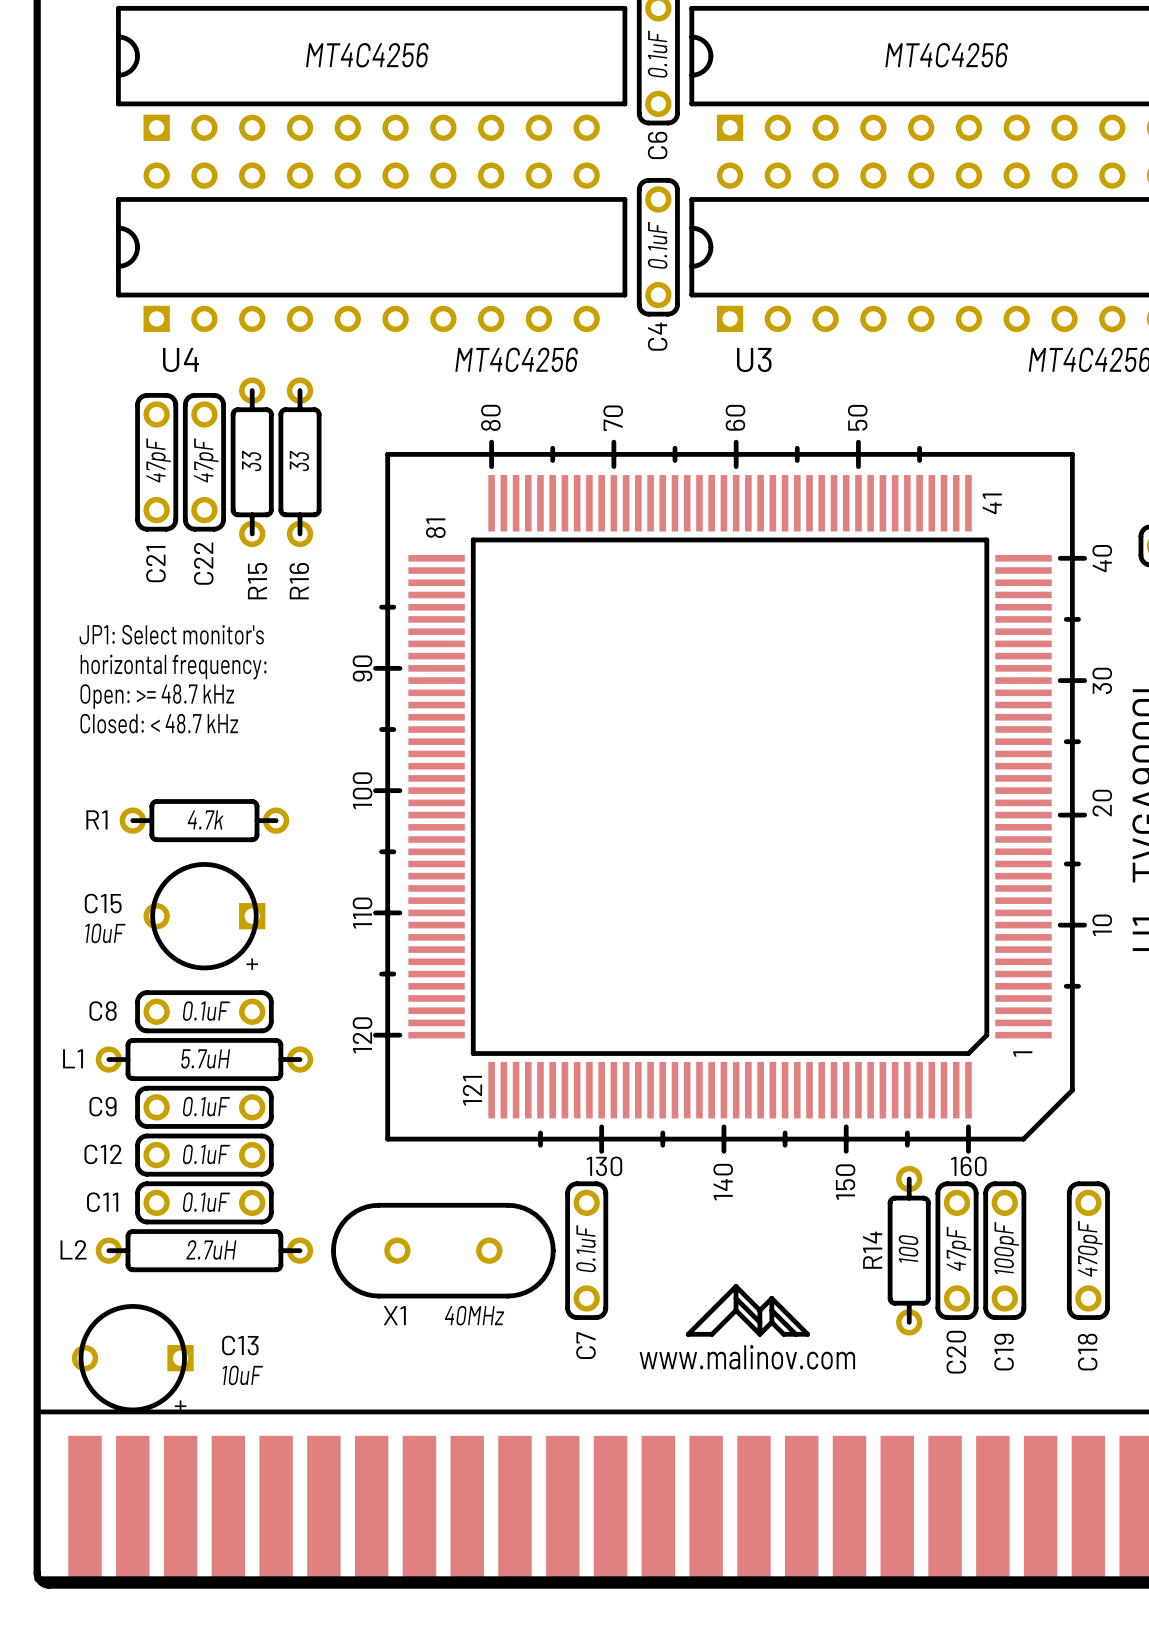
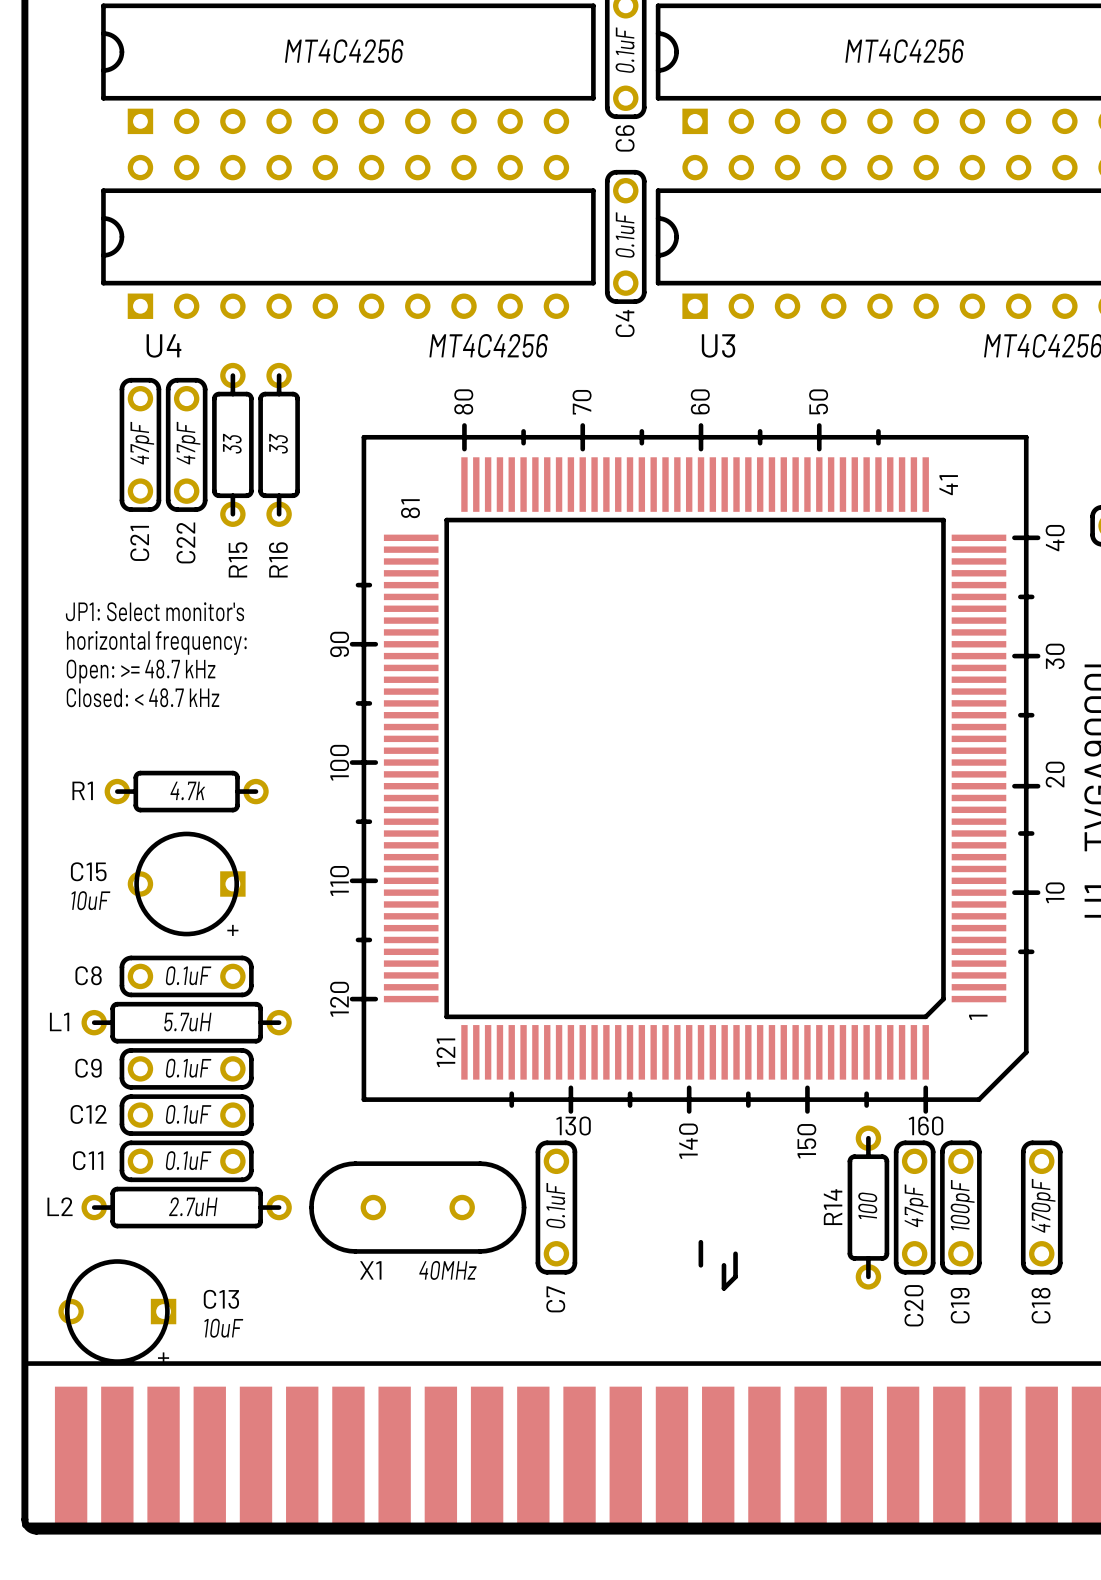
line: (736, 1298) (759, 1322) -> none
line: (771, 1310) (795, 1334) -> none
line: (771, 1322) (783, 1334) (807, 1334) (771, 1298) (759, 1310) (736, 1286) (688, 1334) (712, 1334) (736, 1310) (759, 1334) -> none
text: www.malinov.com (747, 1357) -> none

